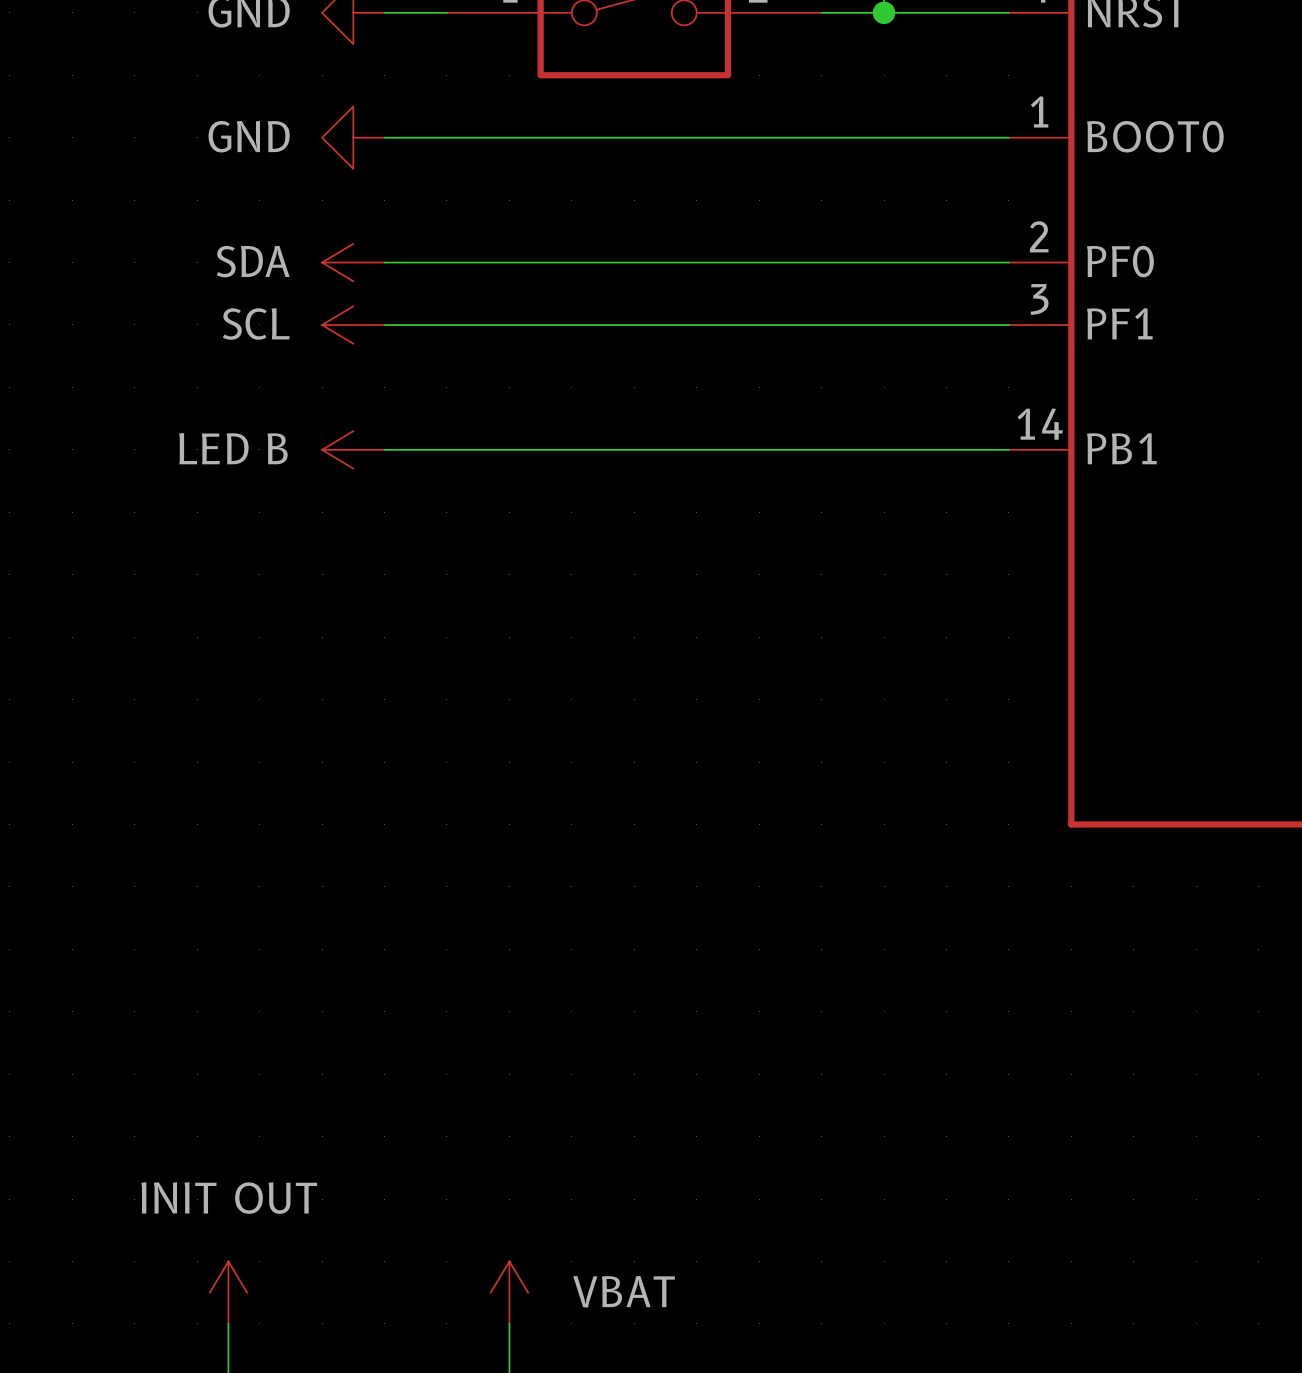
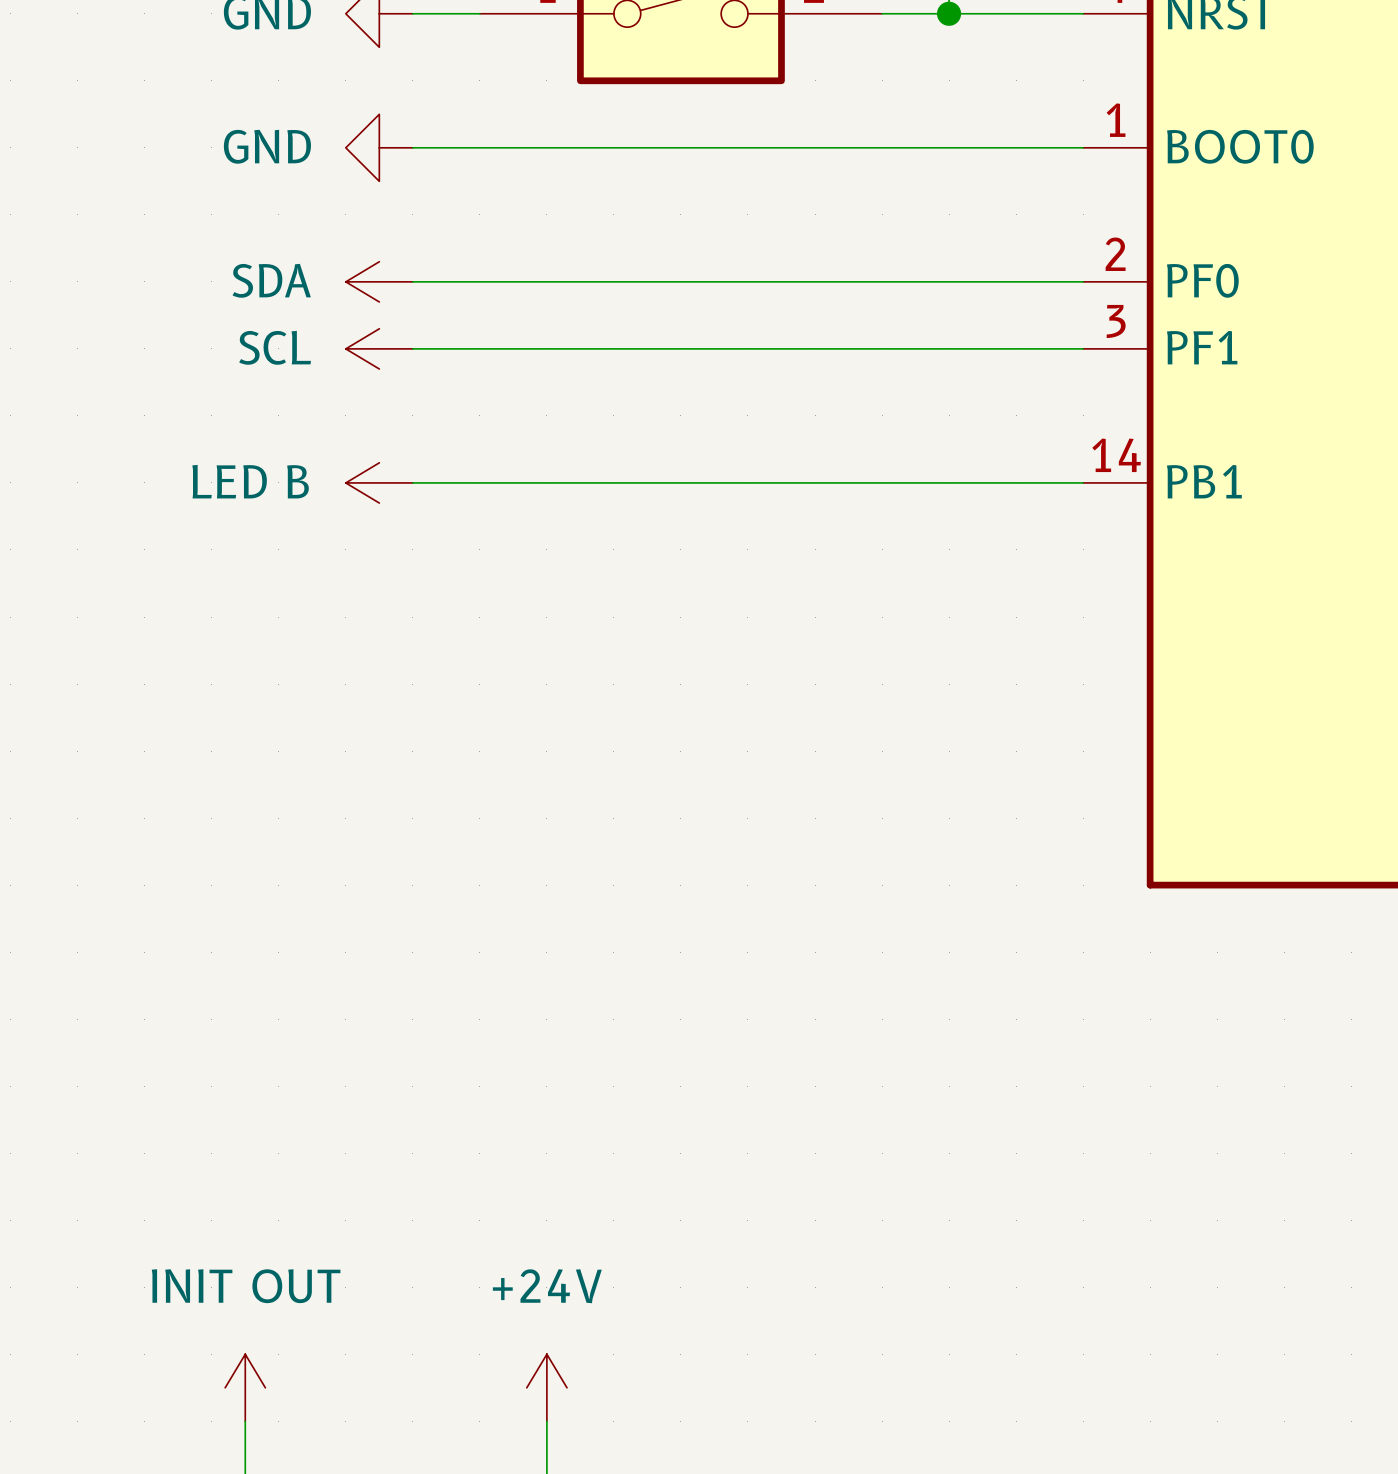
power symbol: VBAT (509, 1292) -> +24V (546, 1387)

